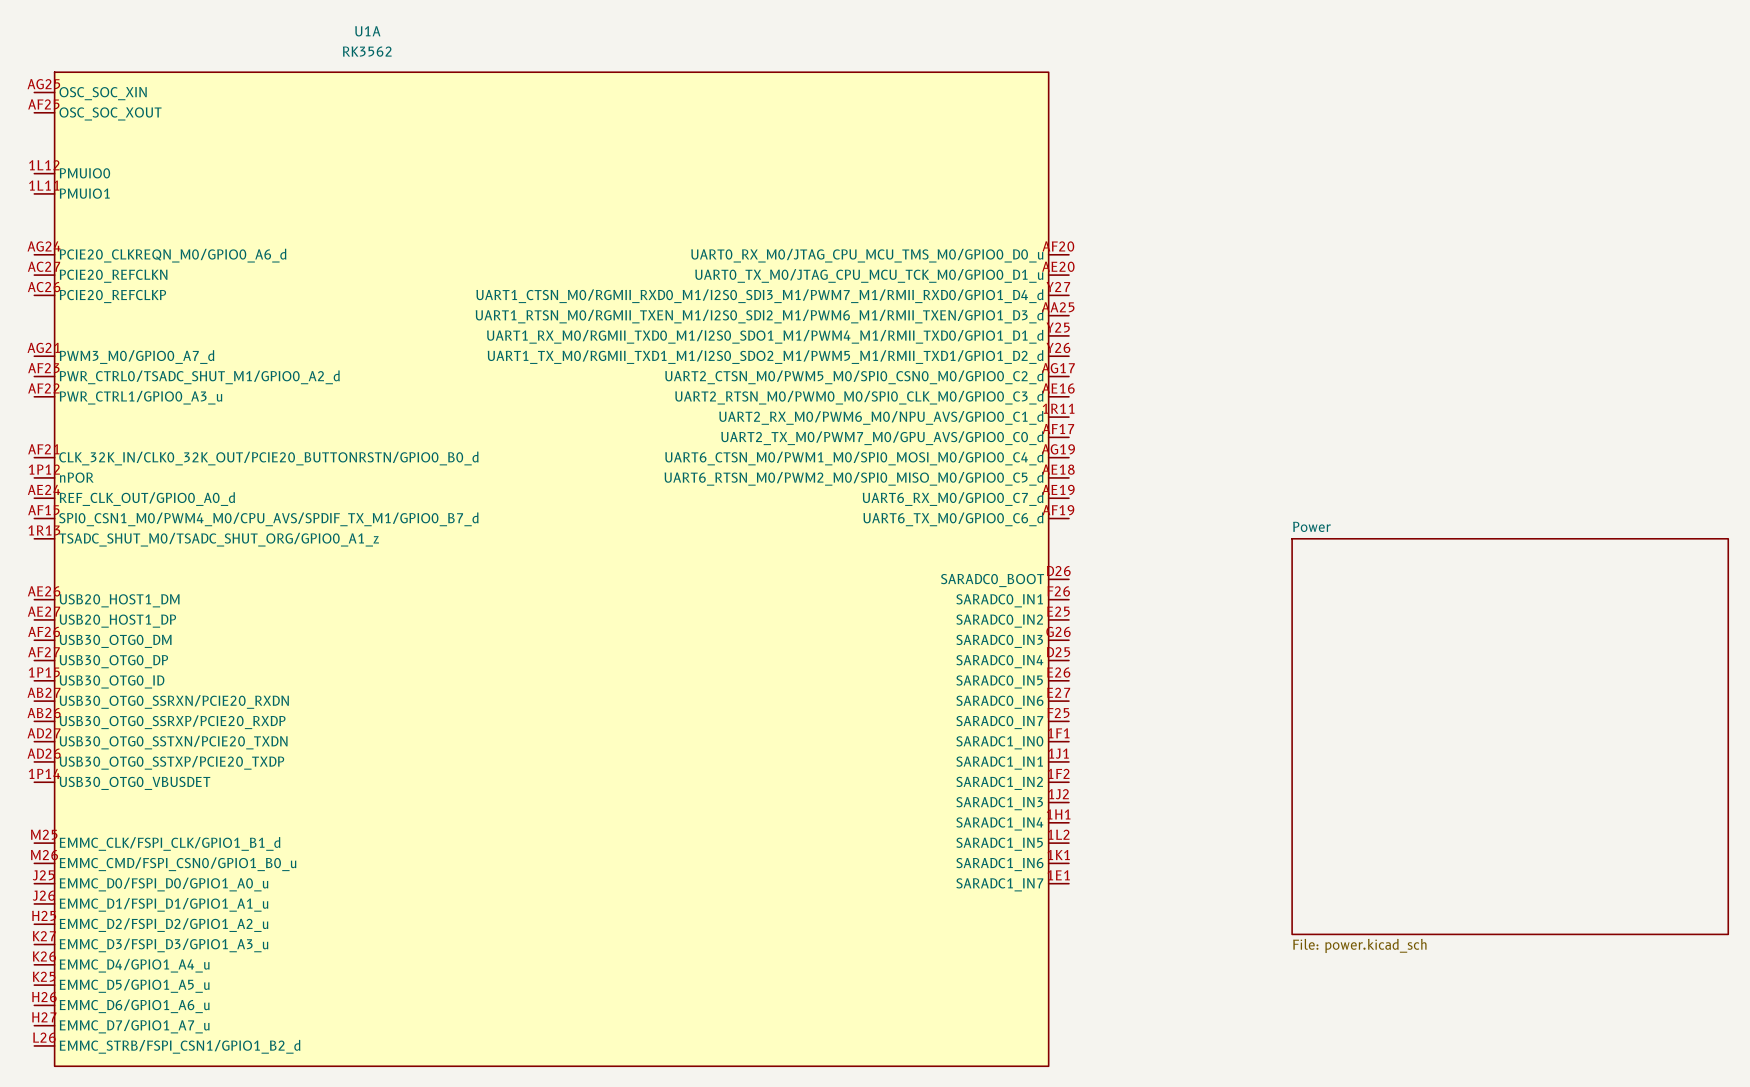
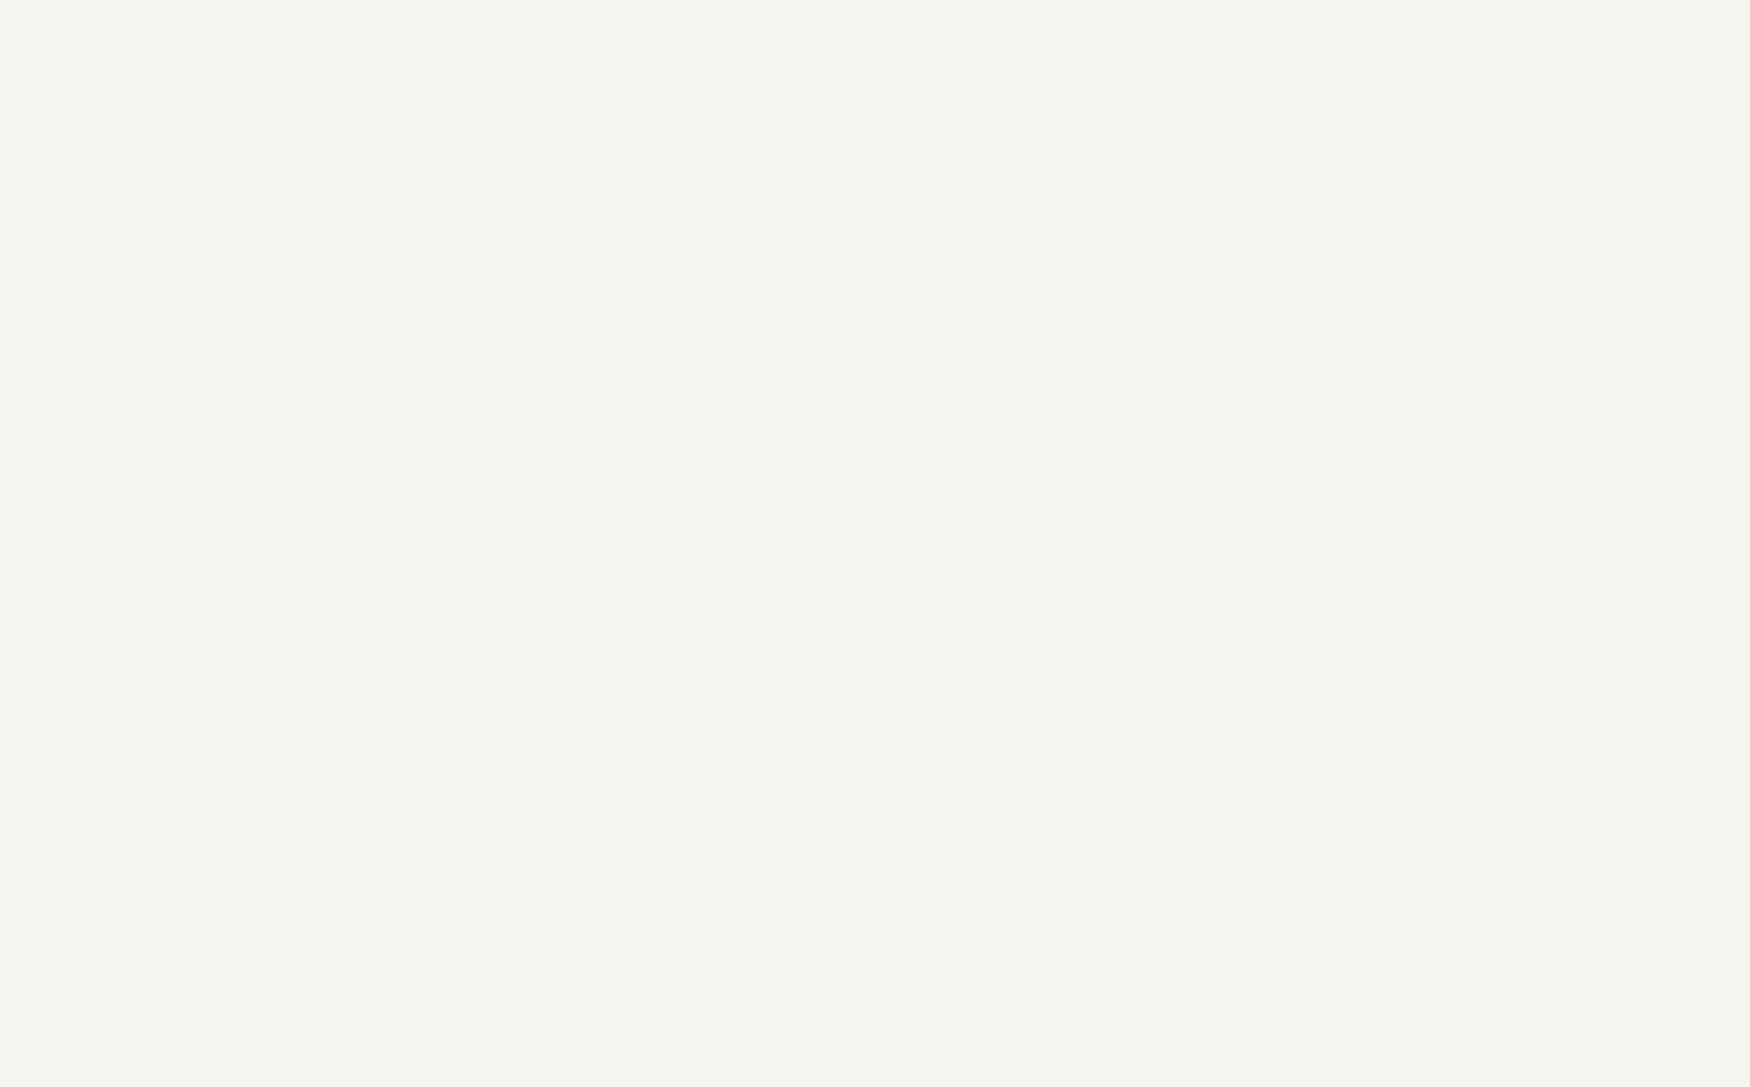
U1A: RK3562 (551, 569) -> none
sheet Power: File: power.kicad_sch (1510, 736) -> none

